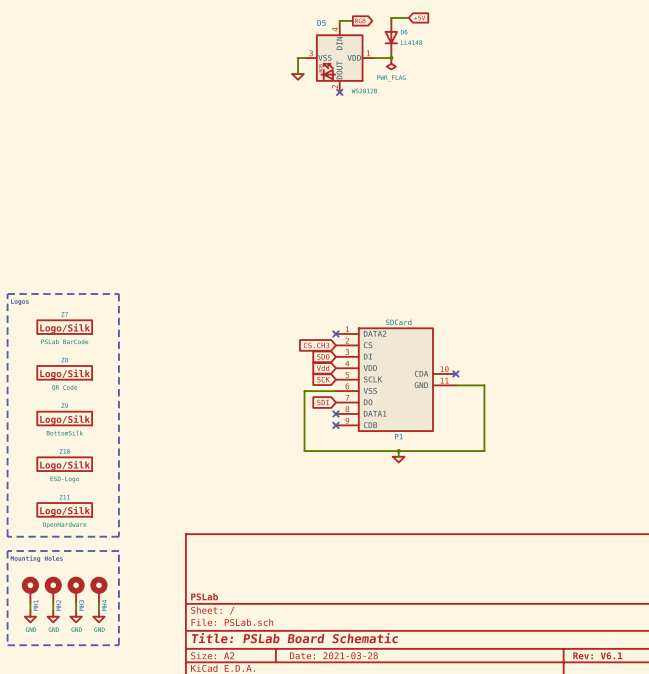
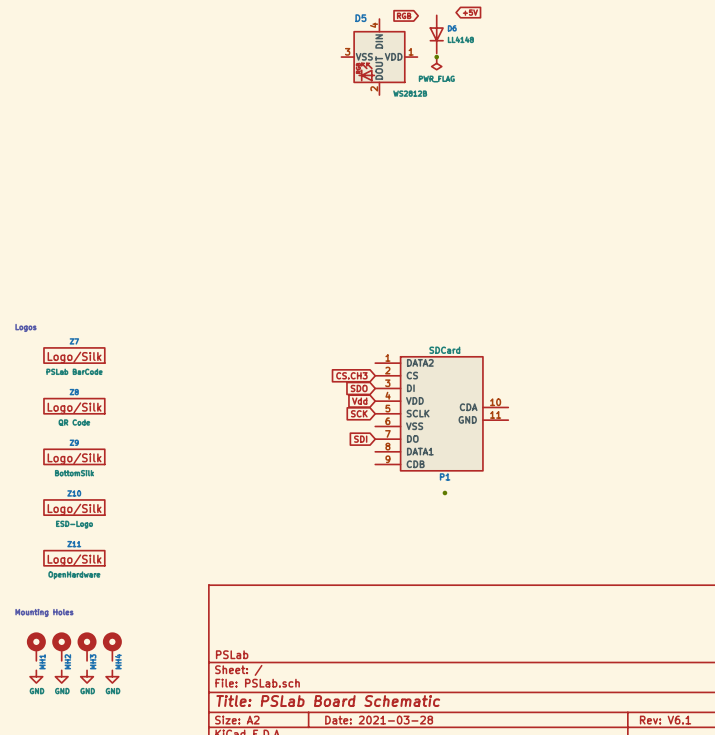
wire: (408, 17) (391, 17) (391, 20) -> none
wire: (352, 20) (339, 20) (339, 23) -> none
wire: (391, 54) (391, 58) (373, 58) -> none
wire: (305, 58) (298, 58) (298, 74) -> none
power symbol: (298, 76) -> none
no-connect mark: (339, 92) -> none
line: (7, 294) (7, 536) (118, 536) (118, 294) (7, 294) -> none
no-connect mark: (335, 333) -> none
no-connect mark: (455, 373) -> none
wire: (455, 385) (484, 385) (484, 451) (304, 451) (304, 391) (335, 391) -> none
no-connect mark: (335, 413) -> none
no-connect mark: (335, 425) -> none
wire: (398, 451) (398, 456) -> none
power symbol: (398, 459) -> none
line: (7, 551) (7, 645) (118, 645) (118, 551) (7, 551) -> none
wire: (30, 602) (30, 610) -> none
wire: (53, 602) (53, 610) -> none
wire: (76, 602) (76, 610) -> none
wire: (98, 602) (98, 610) -> none

